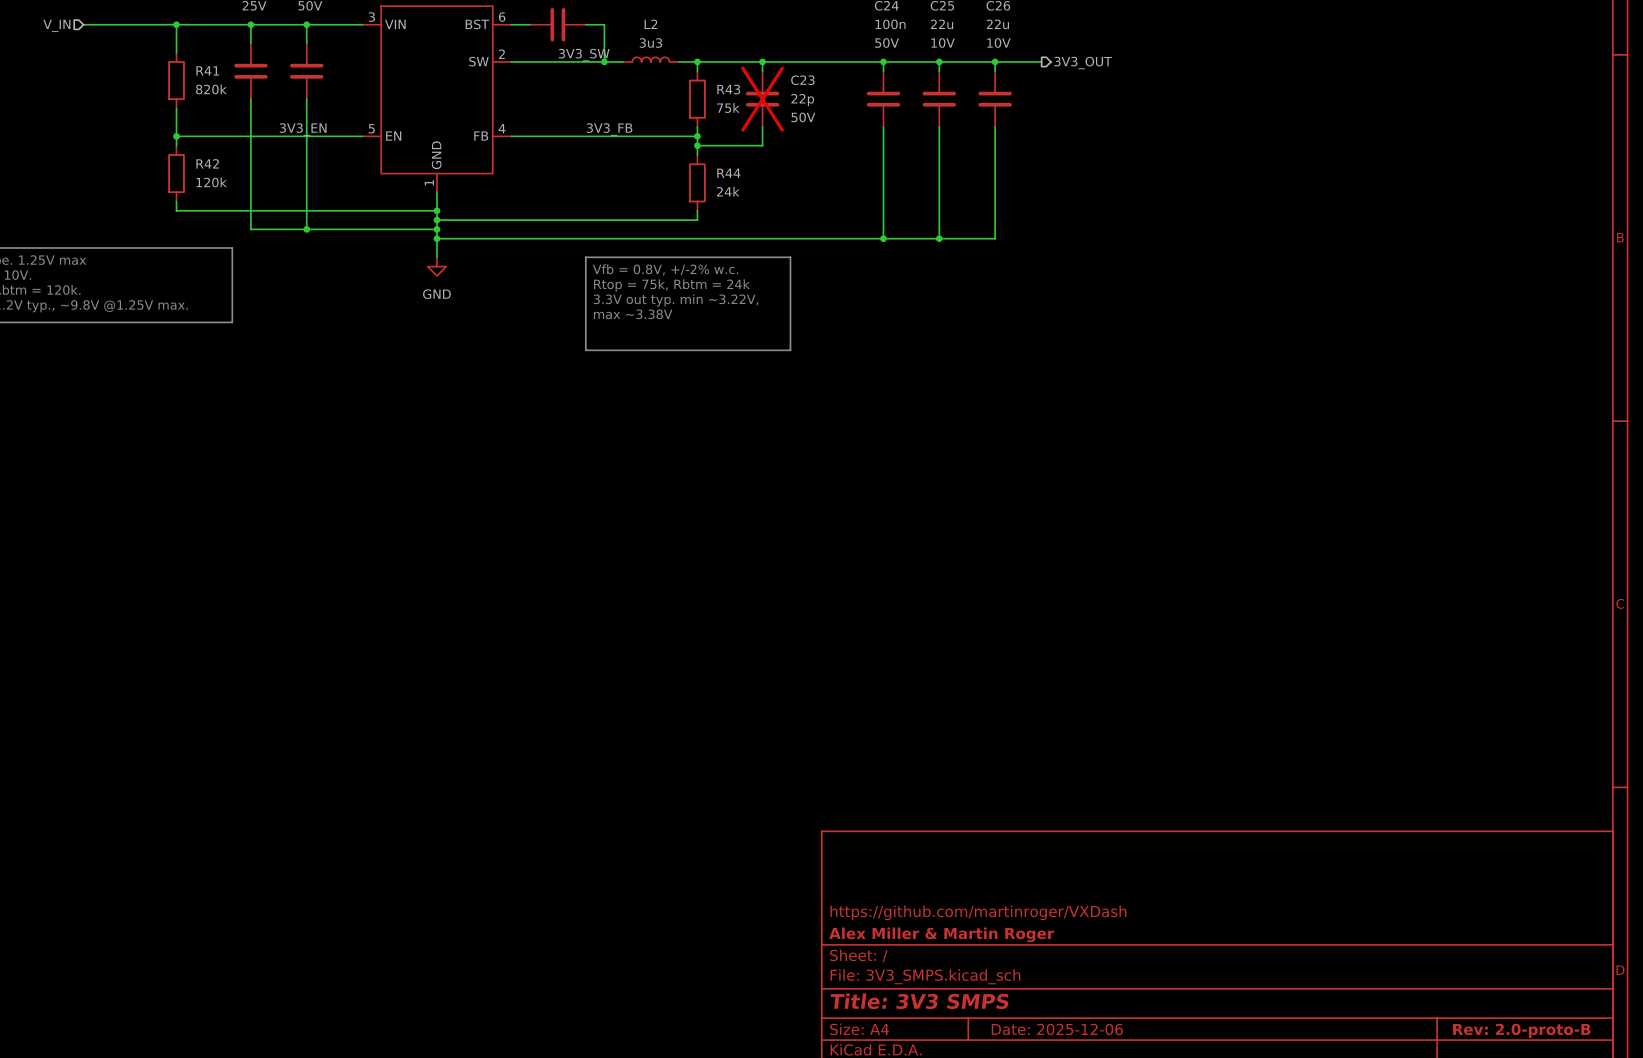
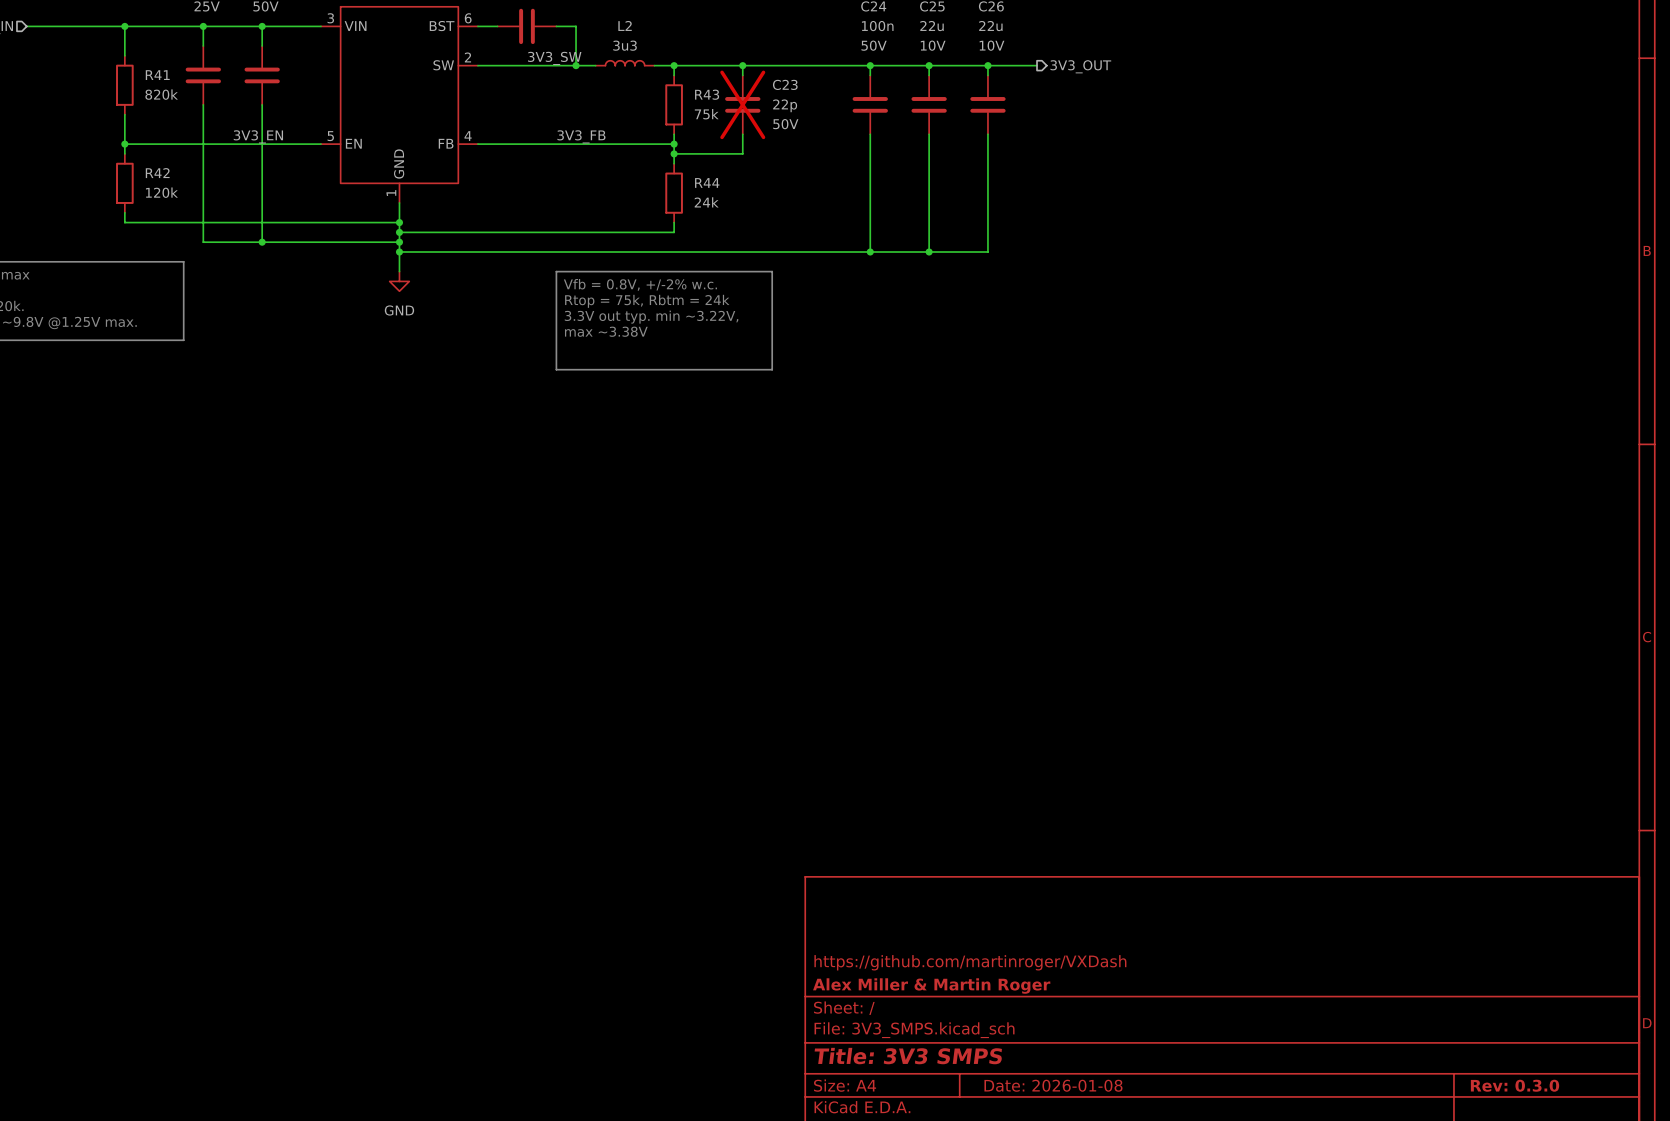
title block: Date: 2025-12-06 (1057, 1029) -> Date: 2026-01-08 (1053, 1085)
title block: Rev: 2.0-proto-B (1521, 1030) -> Rev: 0.3.0 (1515, 1085)

